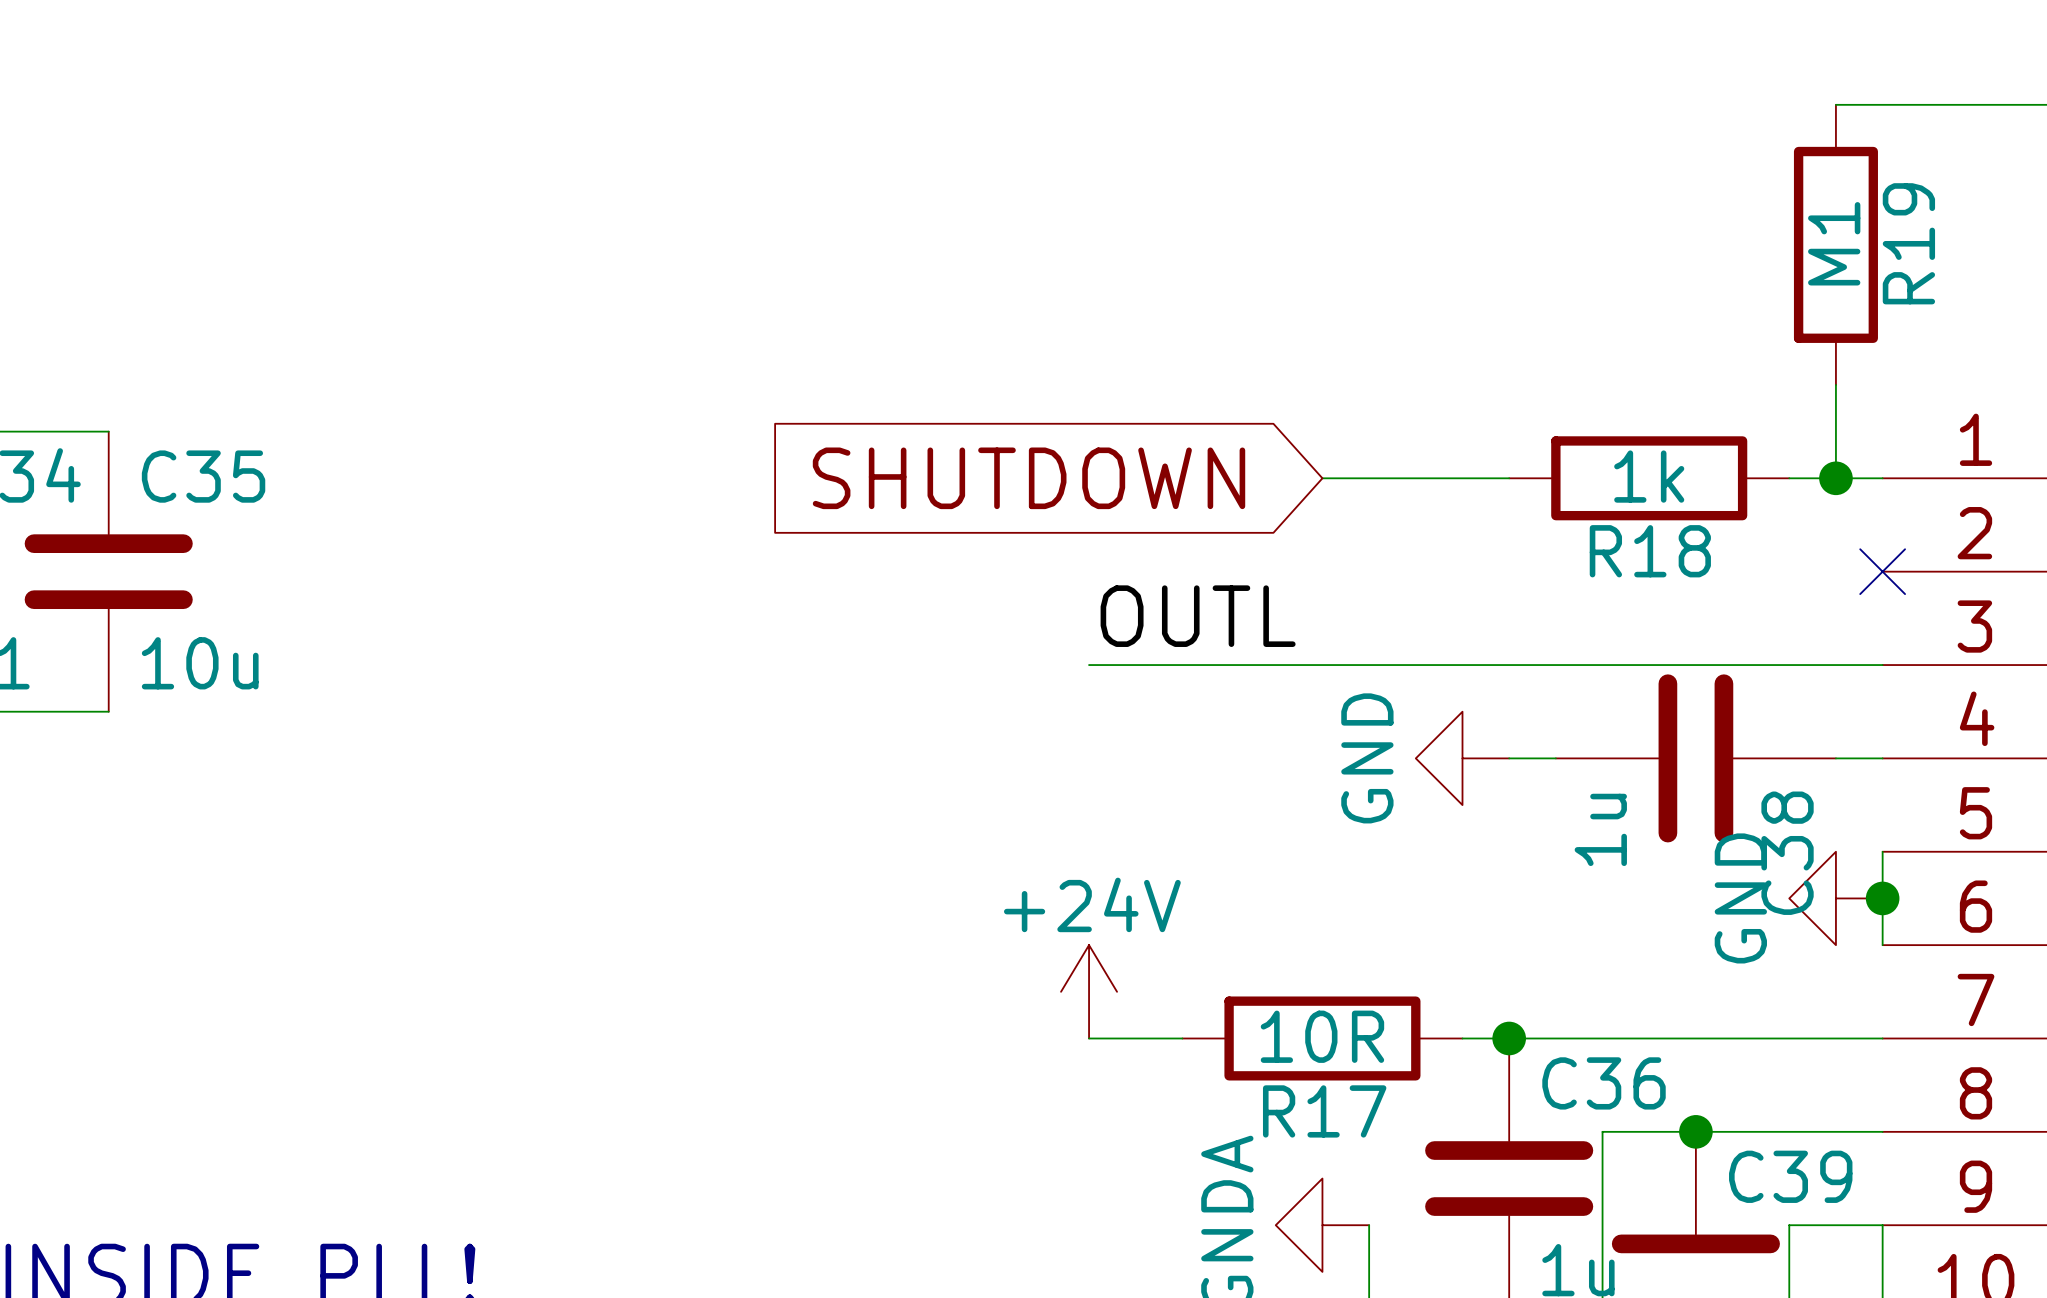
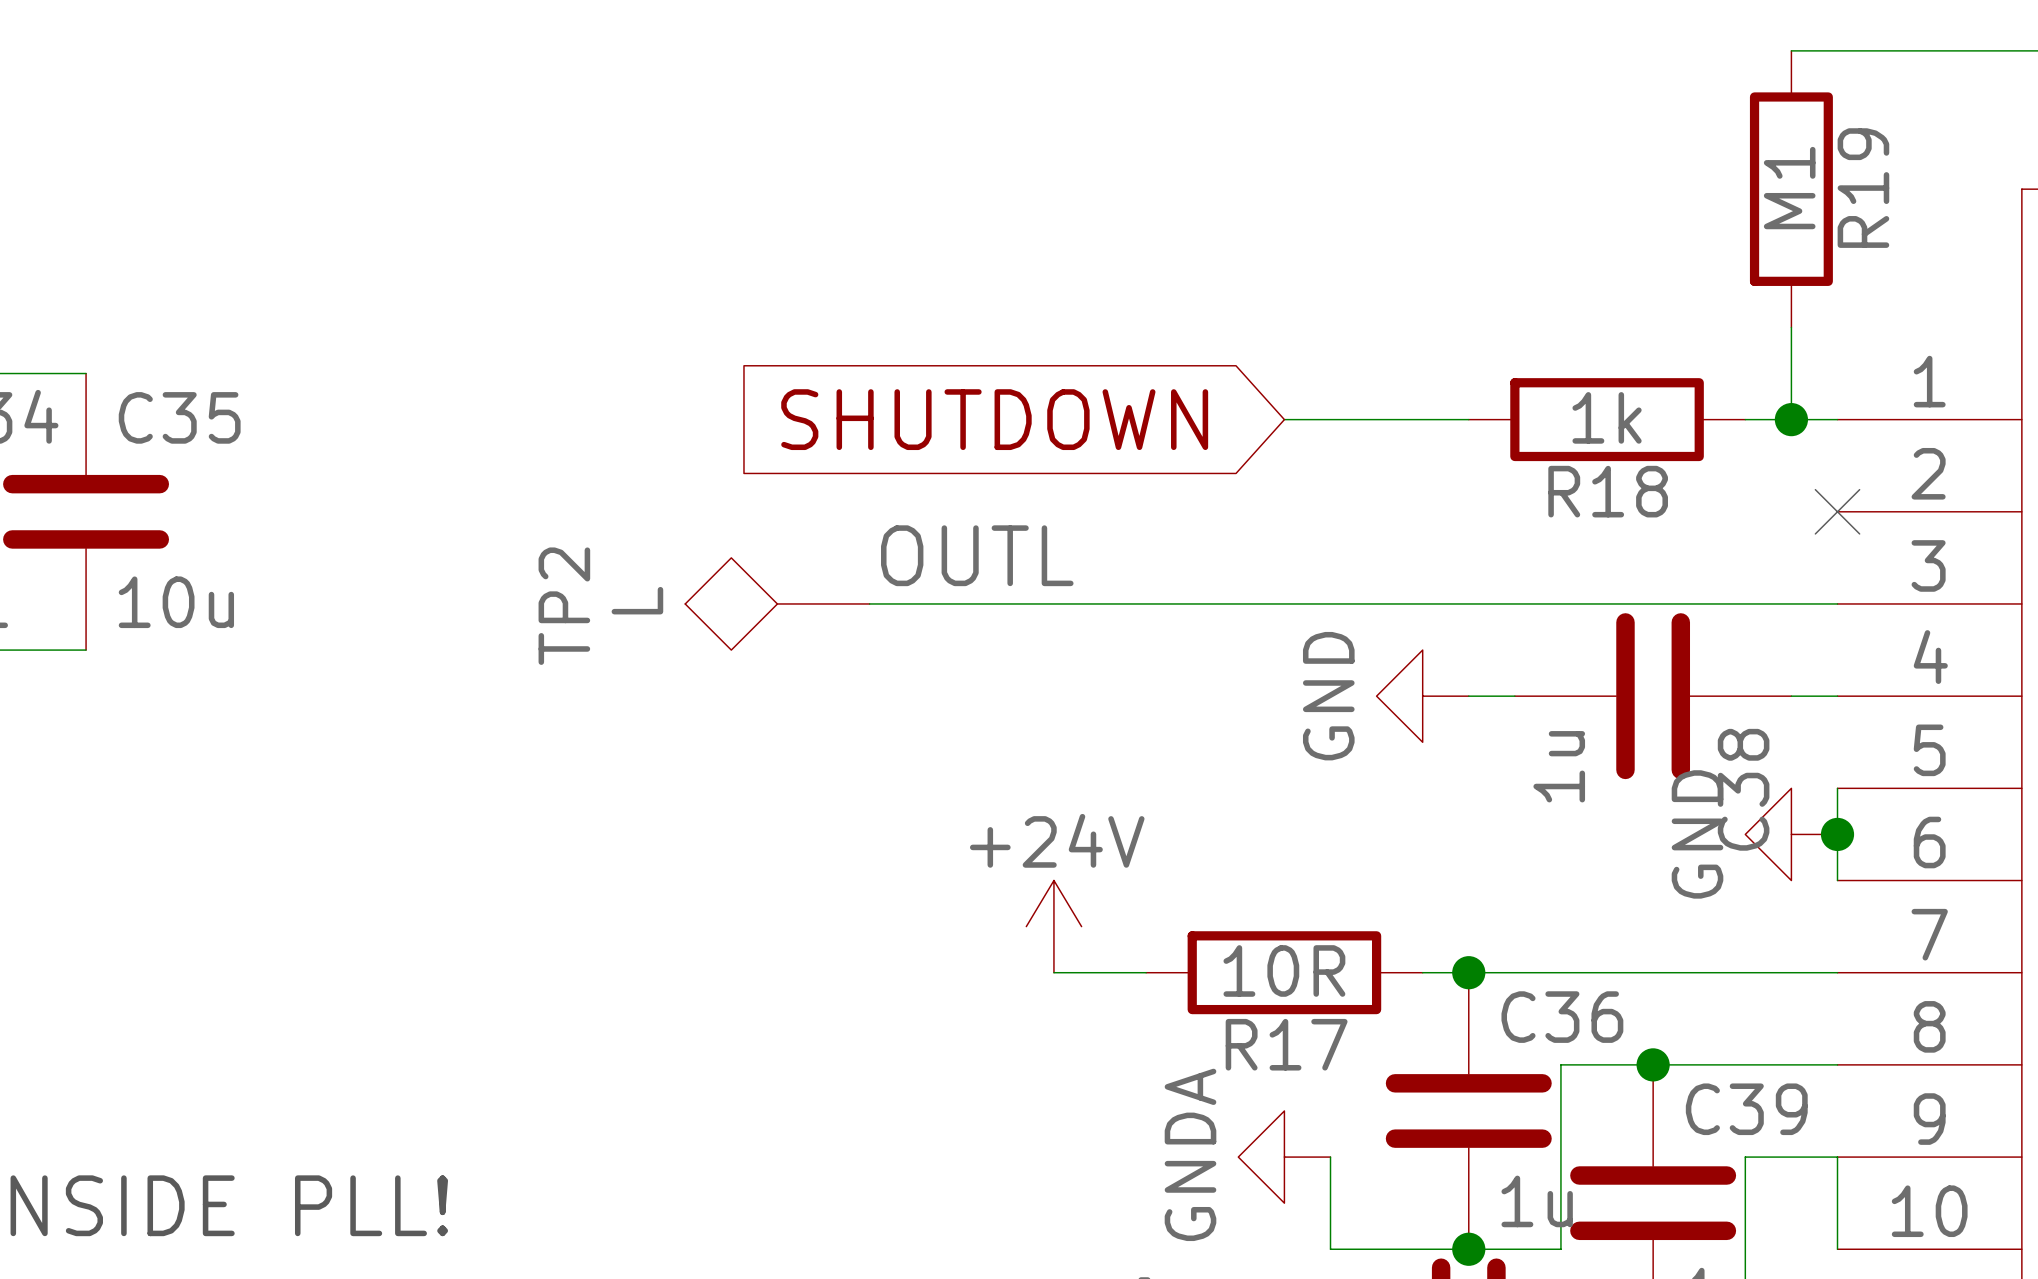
label position: OUTL (1198, 616) -> OUTL (977, 555)
TP2: none -> L (777, 603)
wire: none -> (869, 603) (1053, 603)

